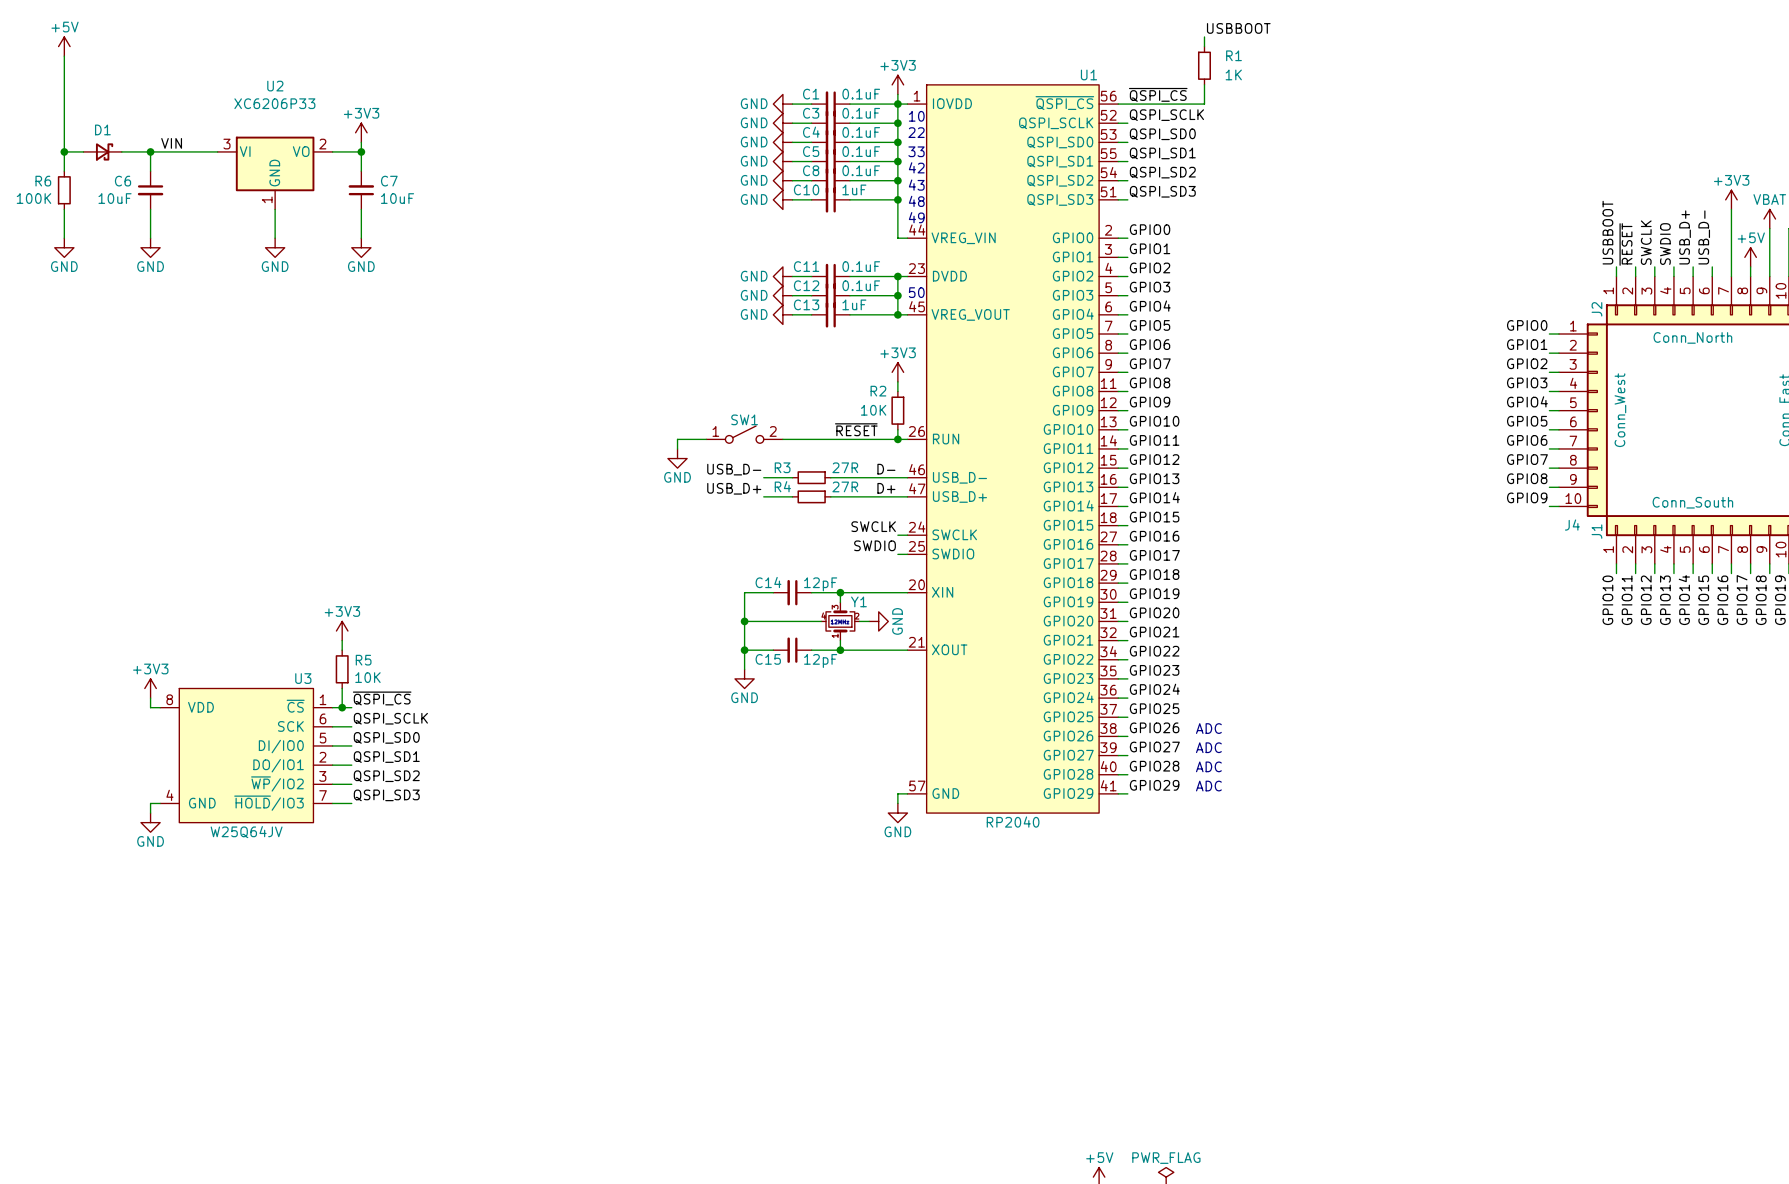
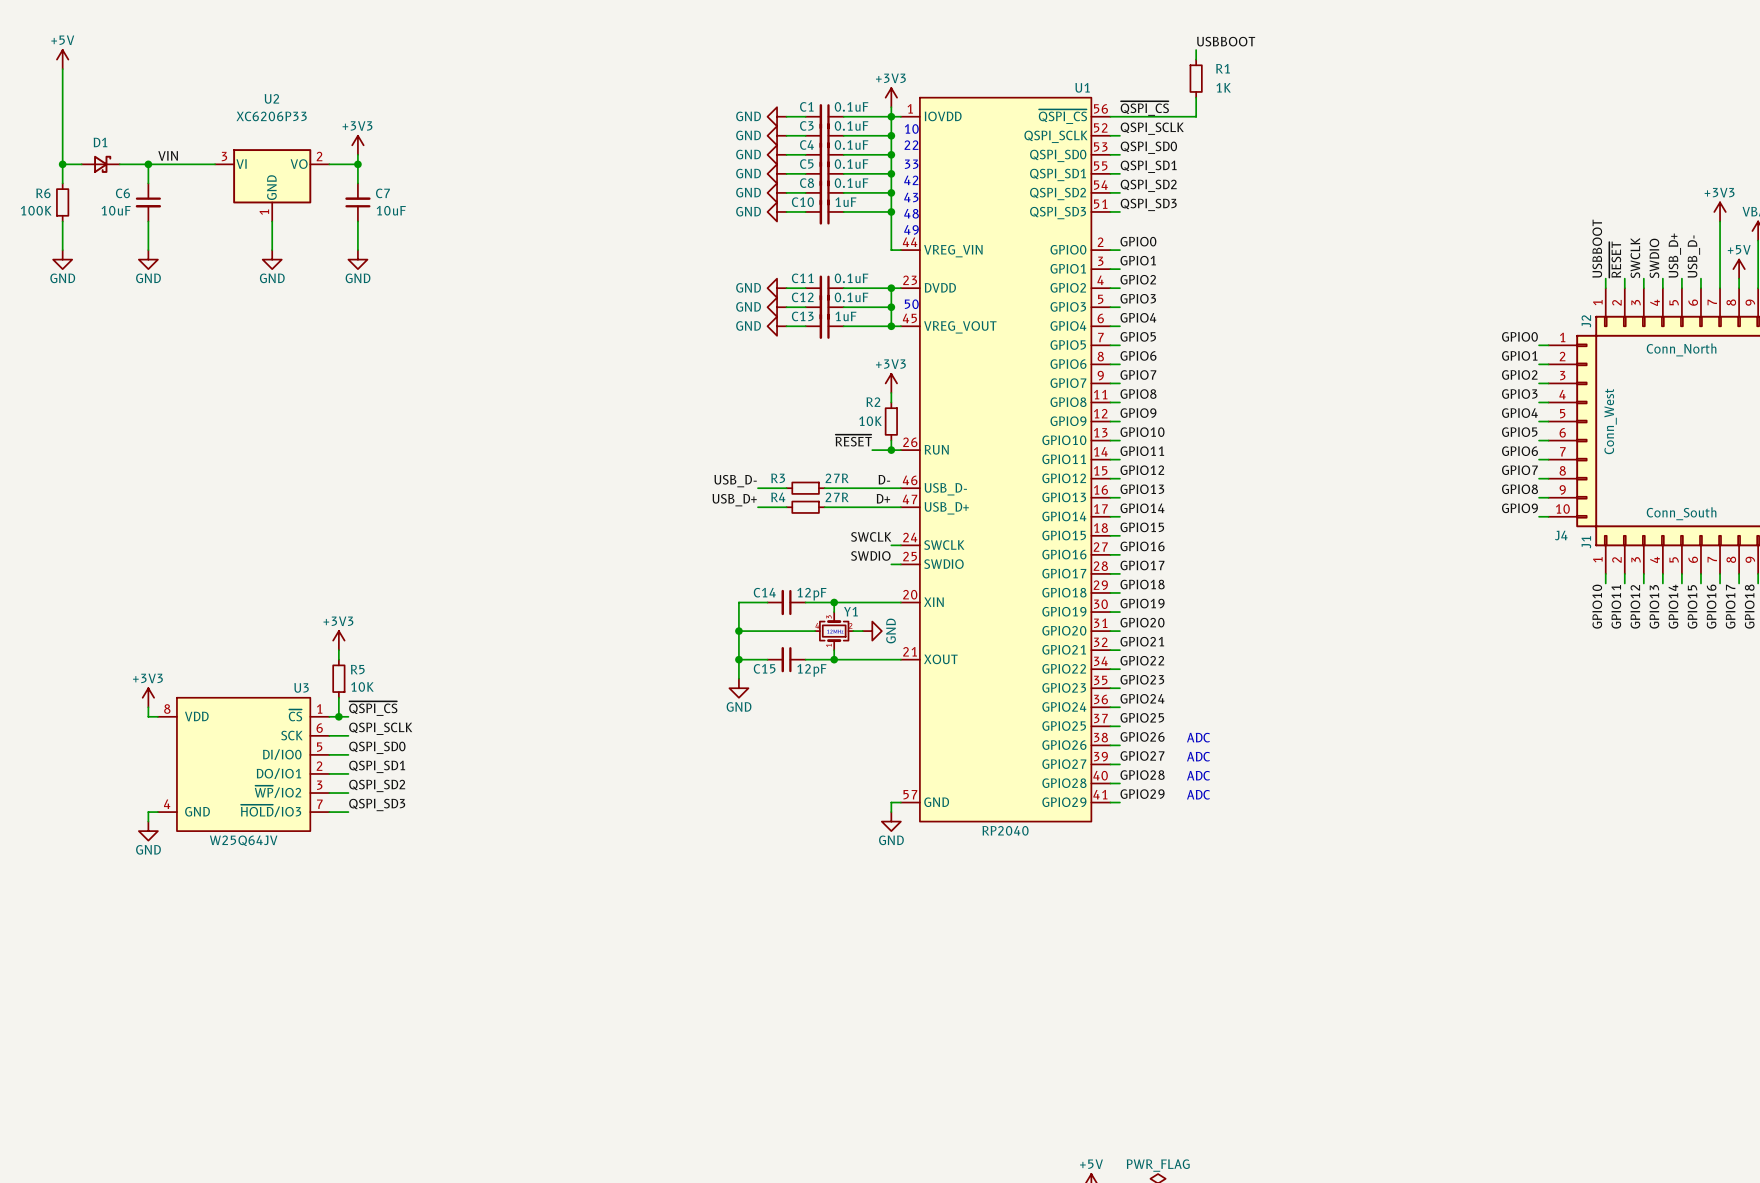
SW1: (744, 434) -> none
wire: (706, 439) (677, 439) (677, 448) -> none
wire: (782, 439) (878, 439) -> none
power symbol: GND (677, 458) -> none

